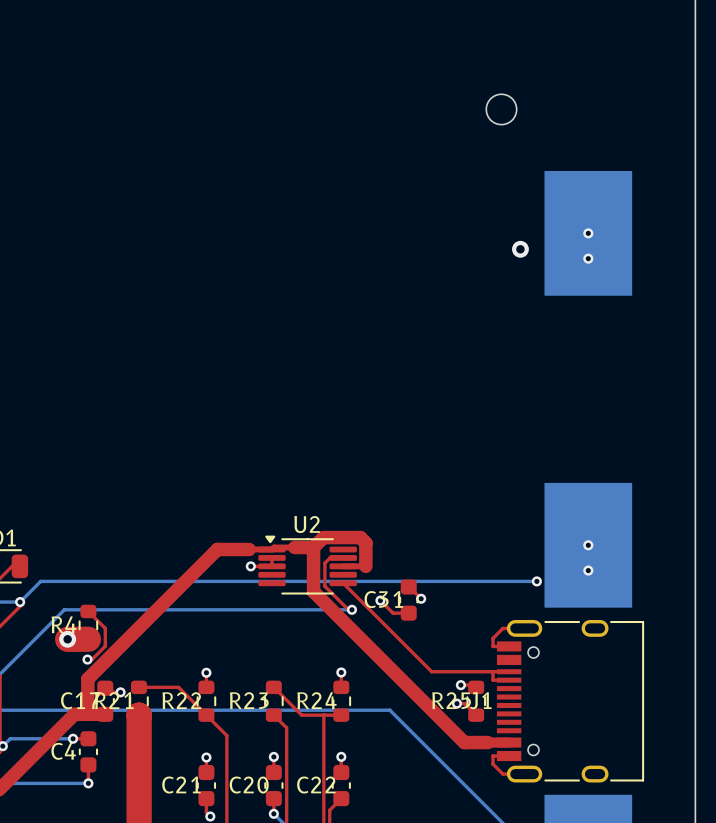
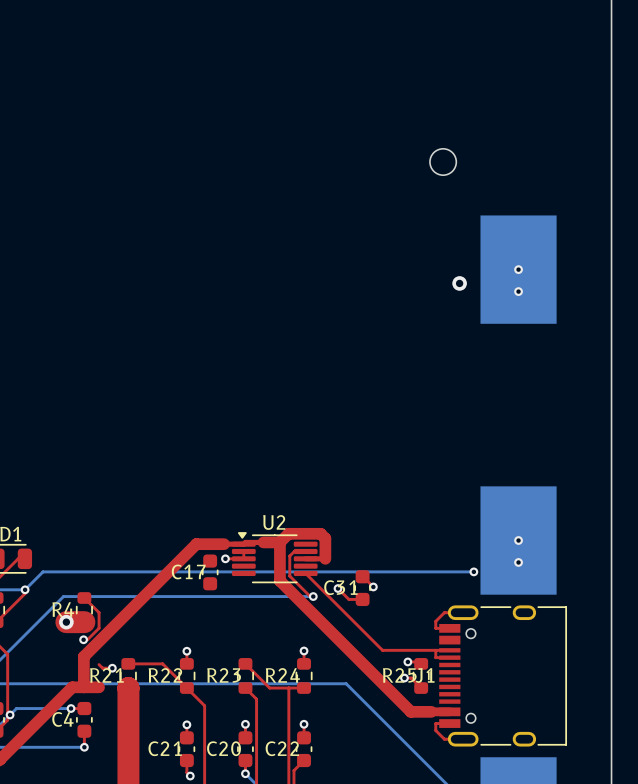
C17 position: (105, 701) -> (210, 572)

